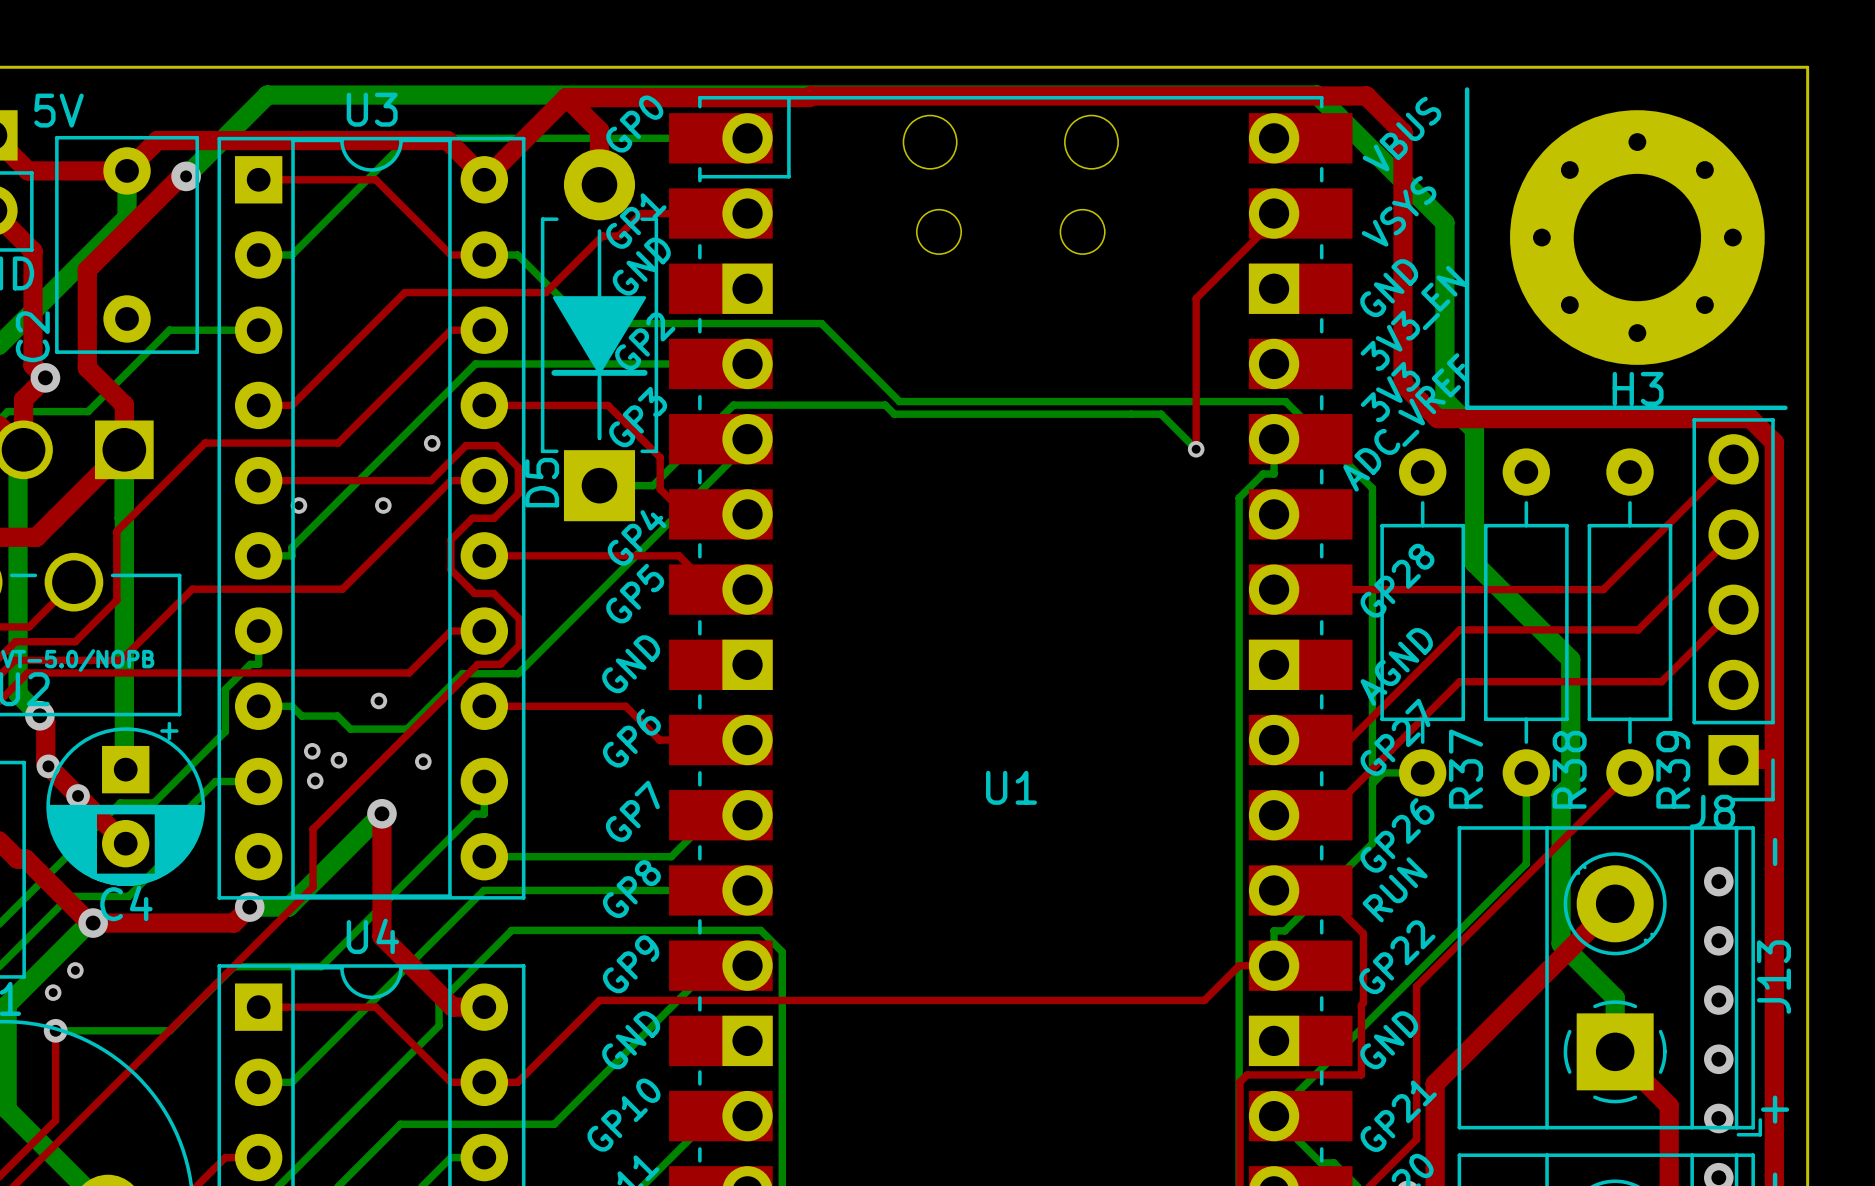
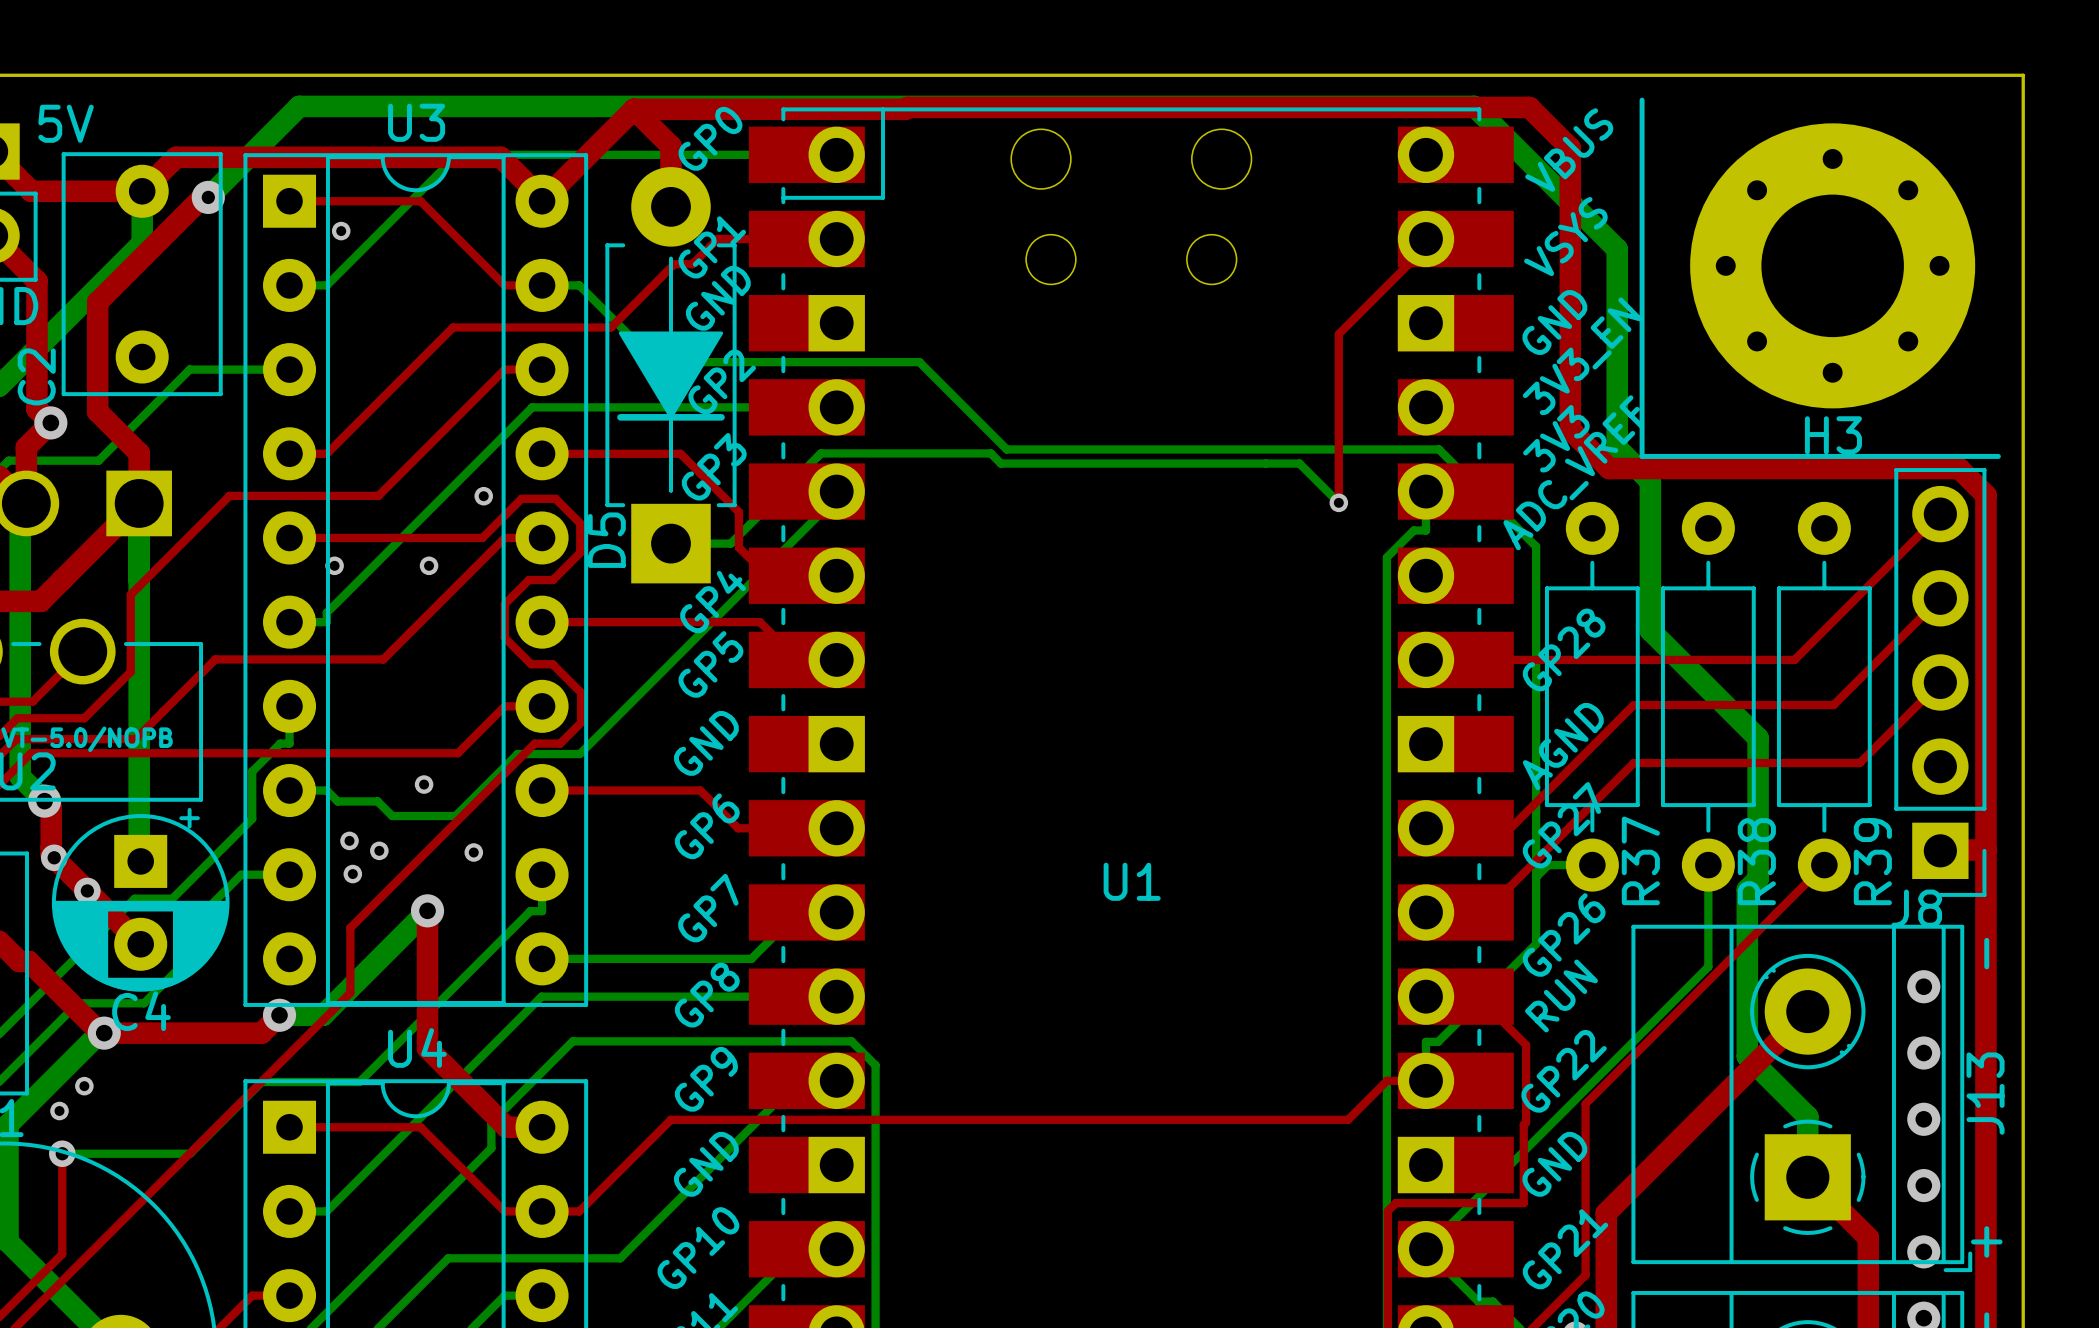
via: none -> (341, 231)

